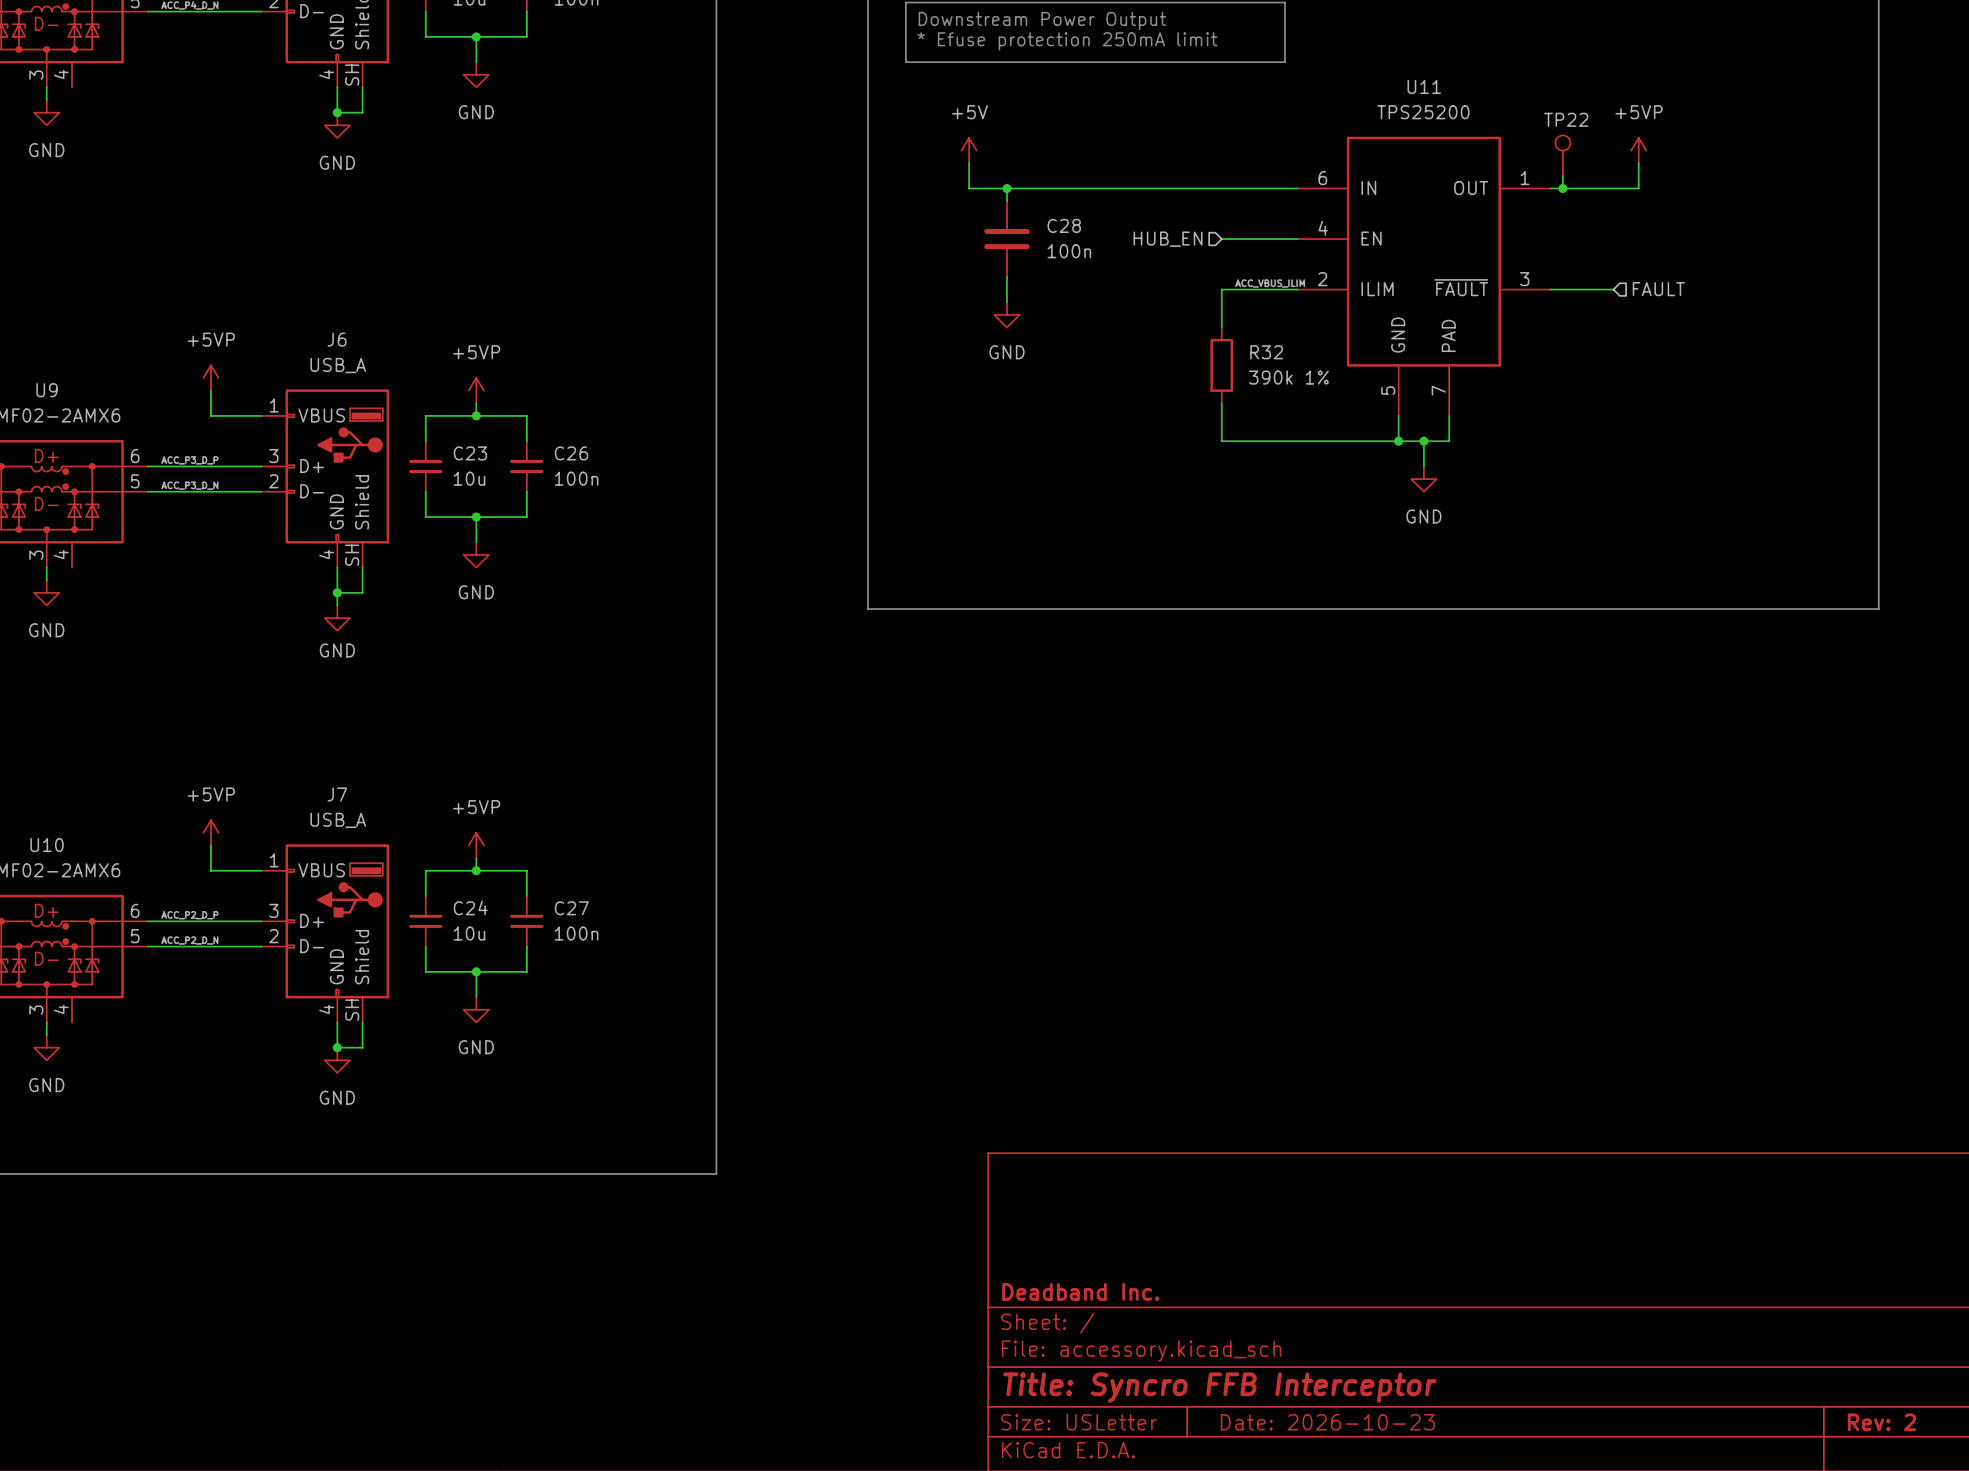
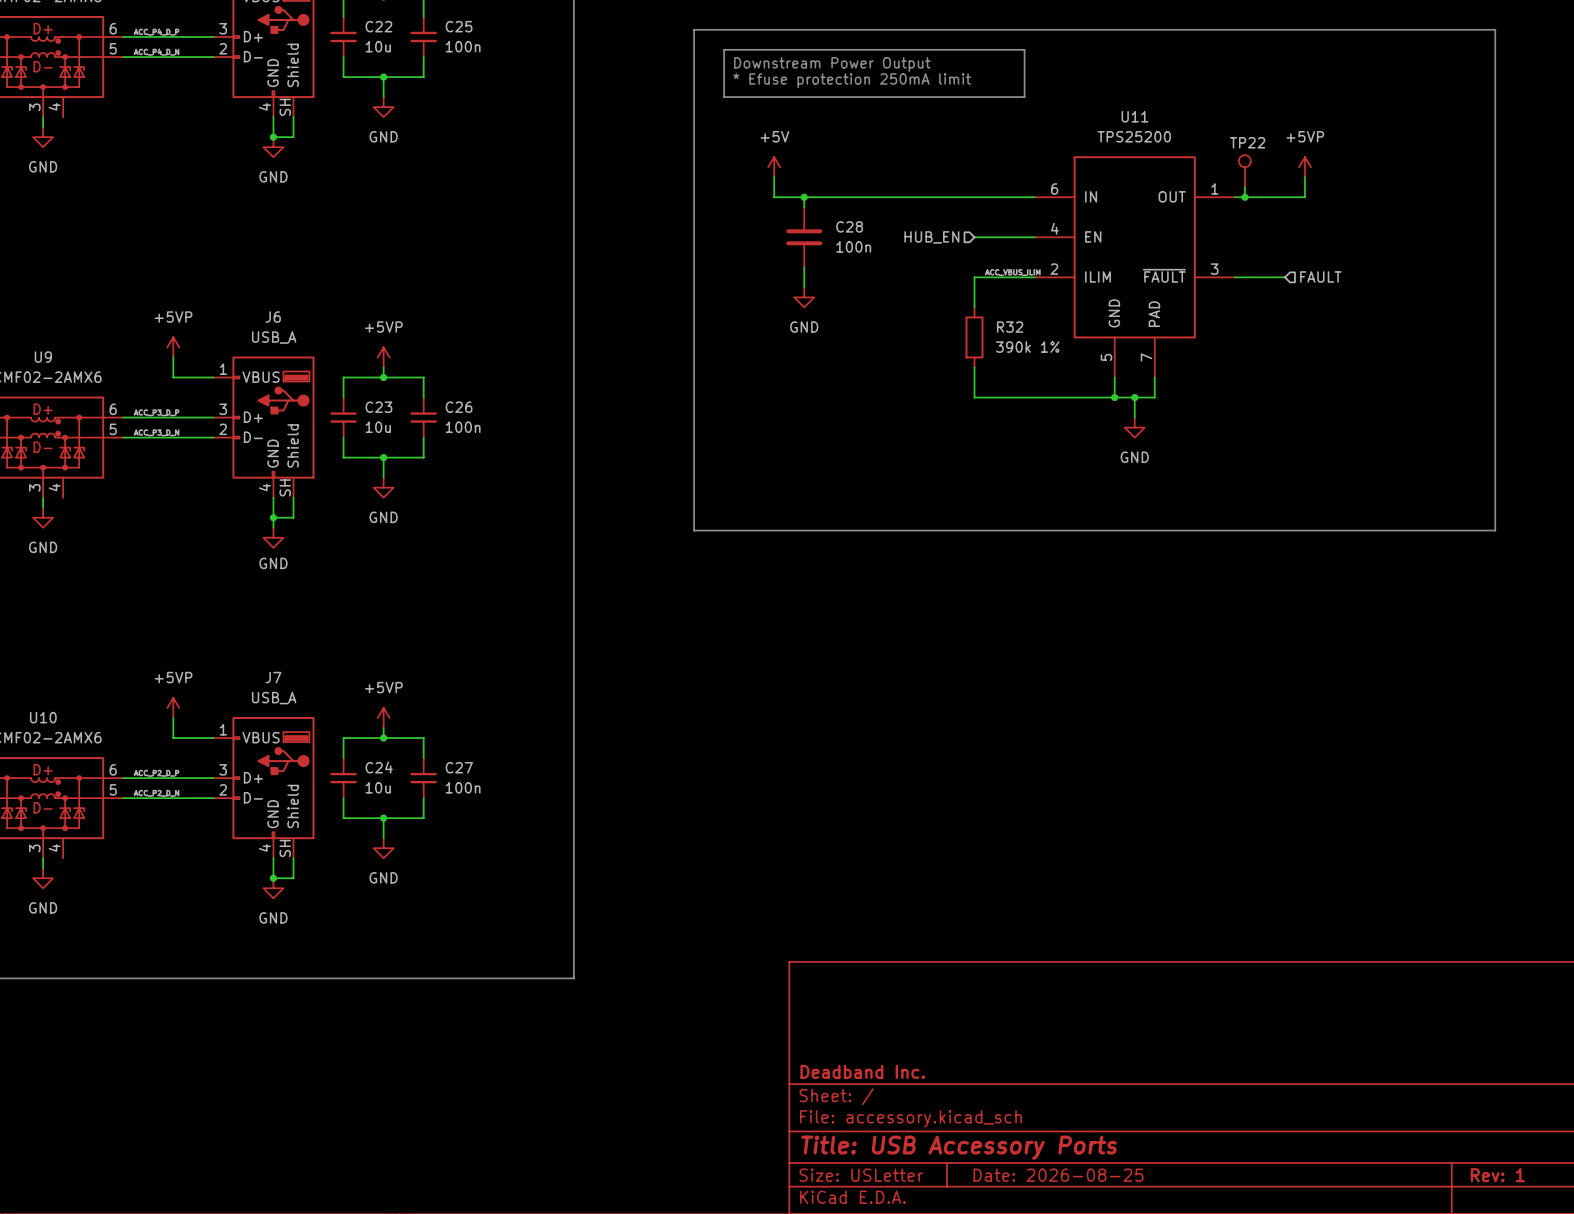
title block: Title: Syncro FFB Interceptor (1219, 1387) -> Title: USB Accessory Ports (958, 1147)
title block: Date: 2026-10-23 (1327, 1422) -> Date: 2026-08-25 (1058, 1175)
title block: Rev: 2 (1881, 1422) -> Rev: 1 (1497, 1175)

